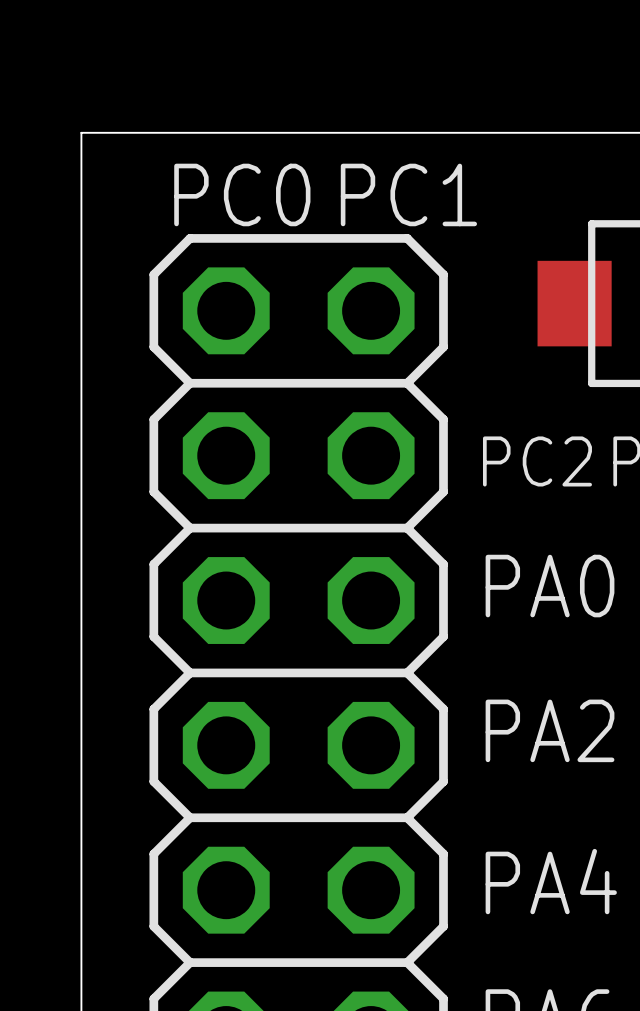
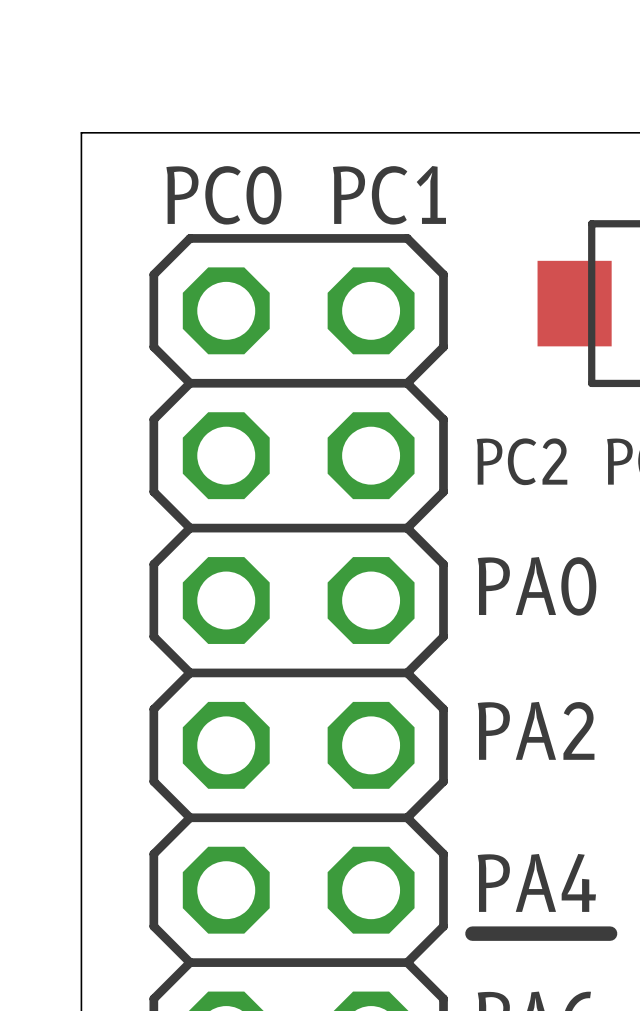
line: none -> (472, 933) (610, 933)

